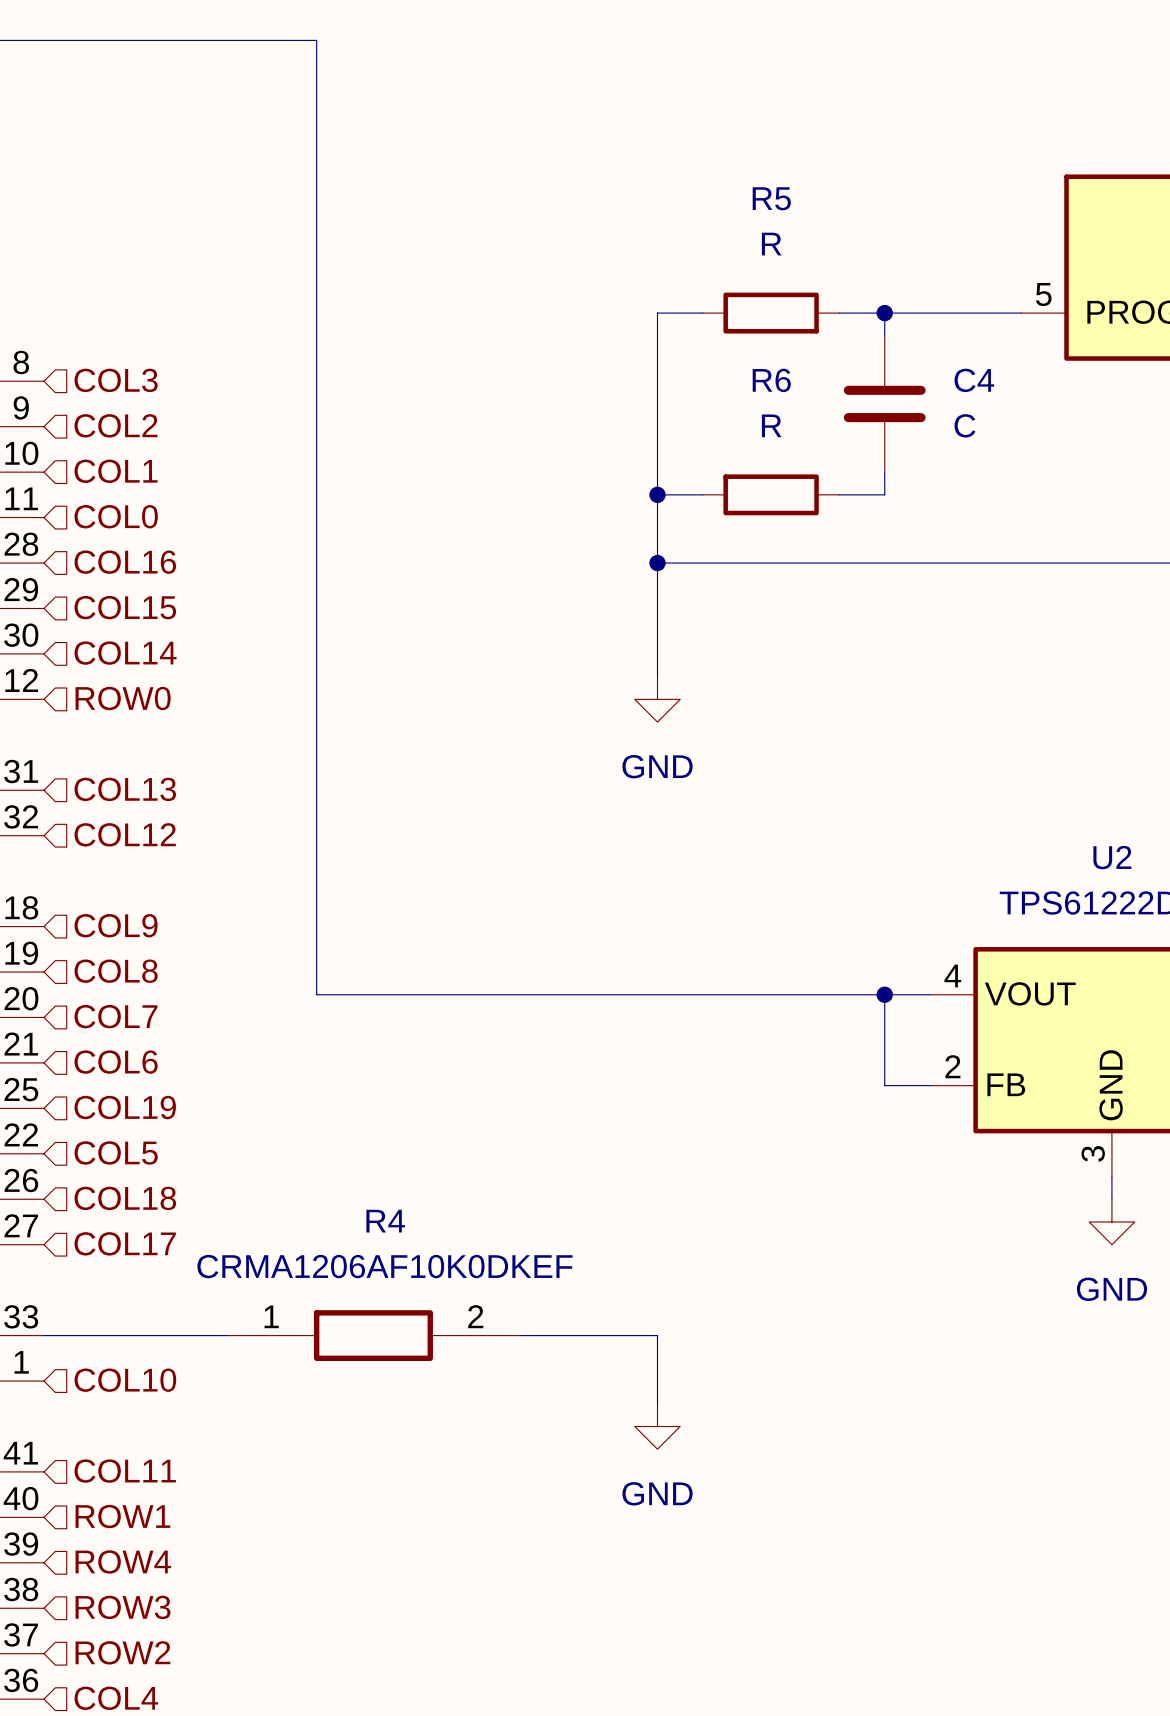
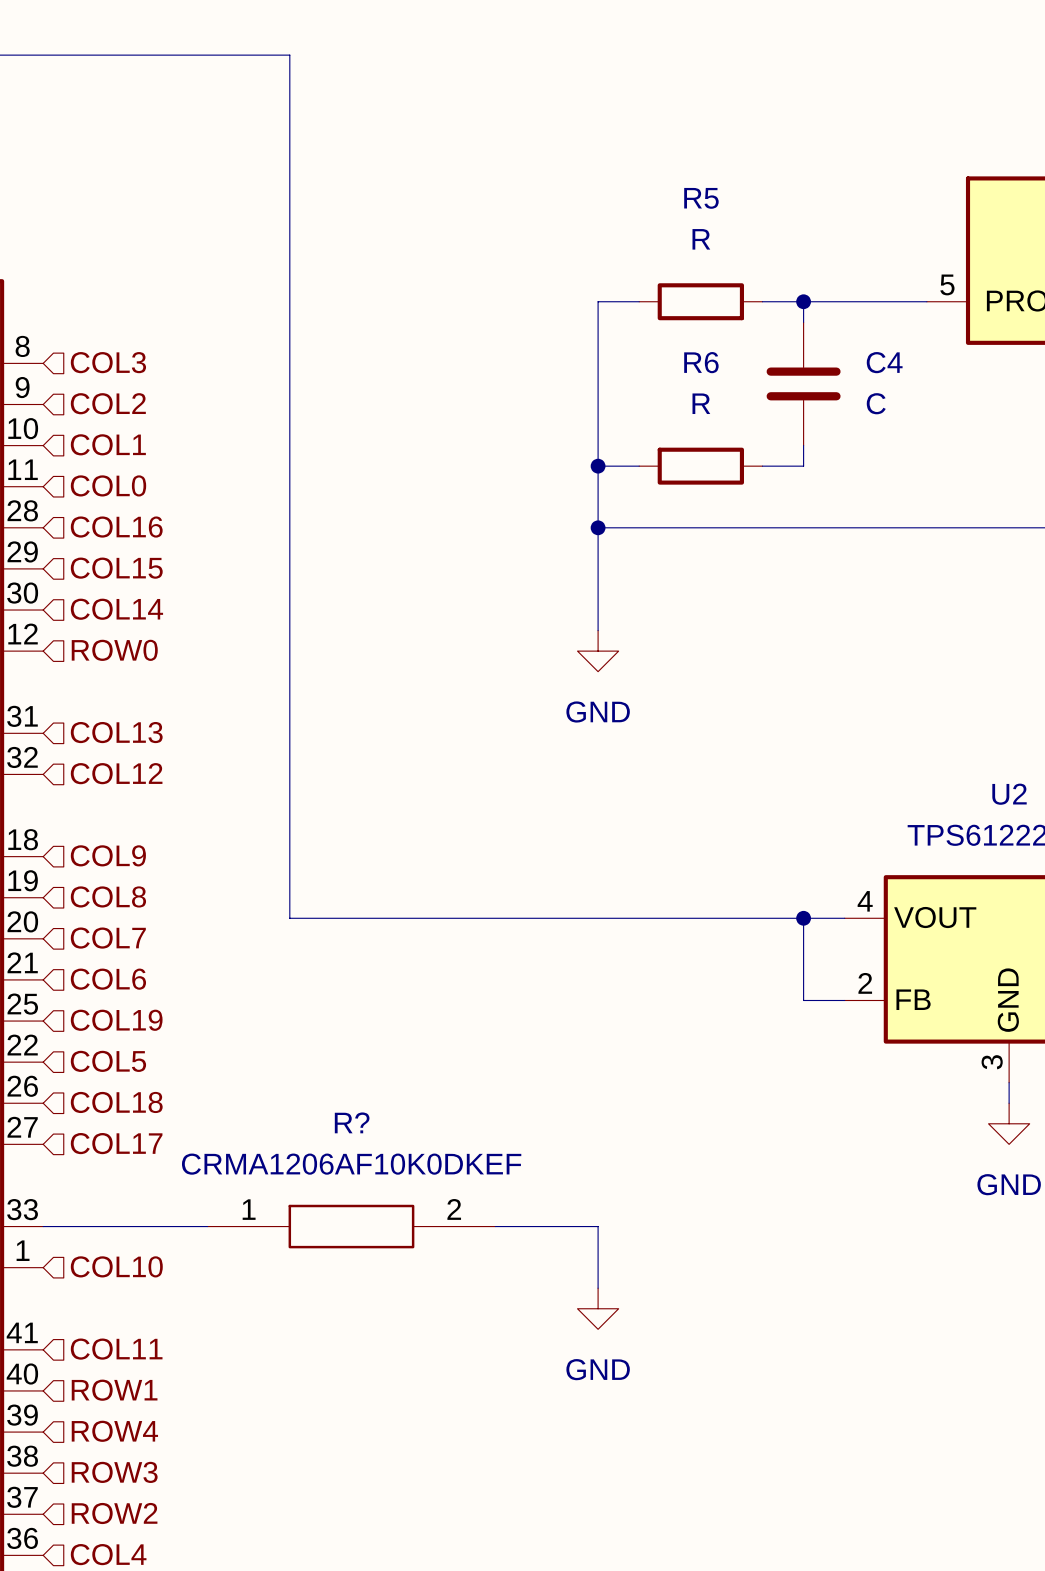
R4: CRMA1206AF10K0DKEF (373, 1335) -> none
R?: none -> CRMA1206AF10K0DKEF (351, 1226)

